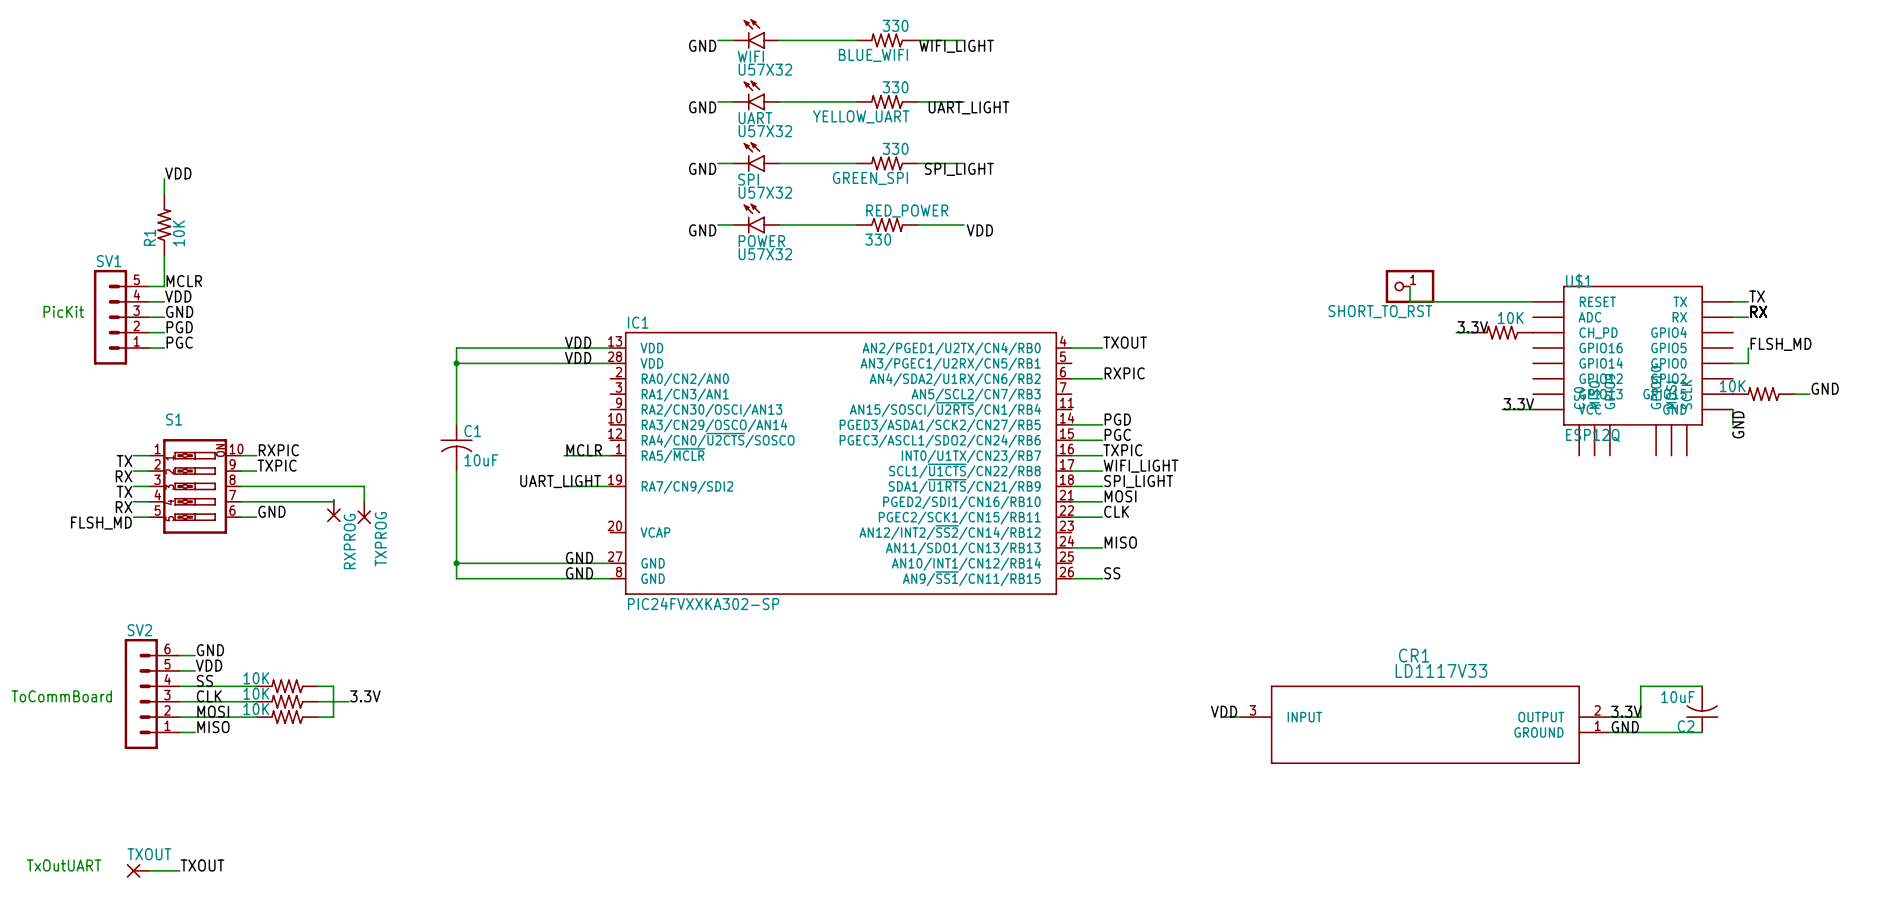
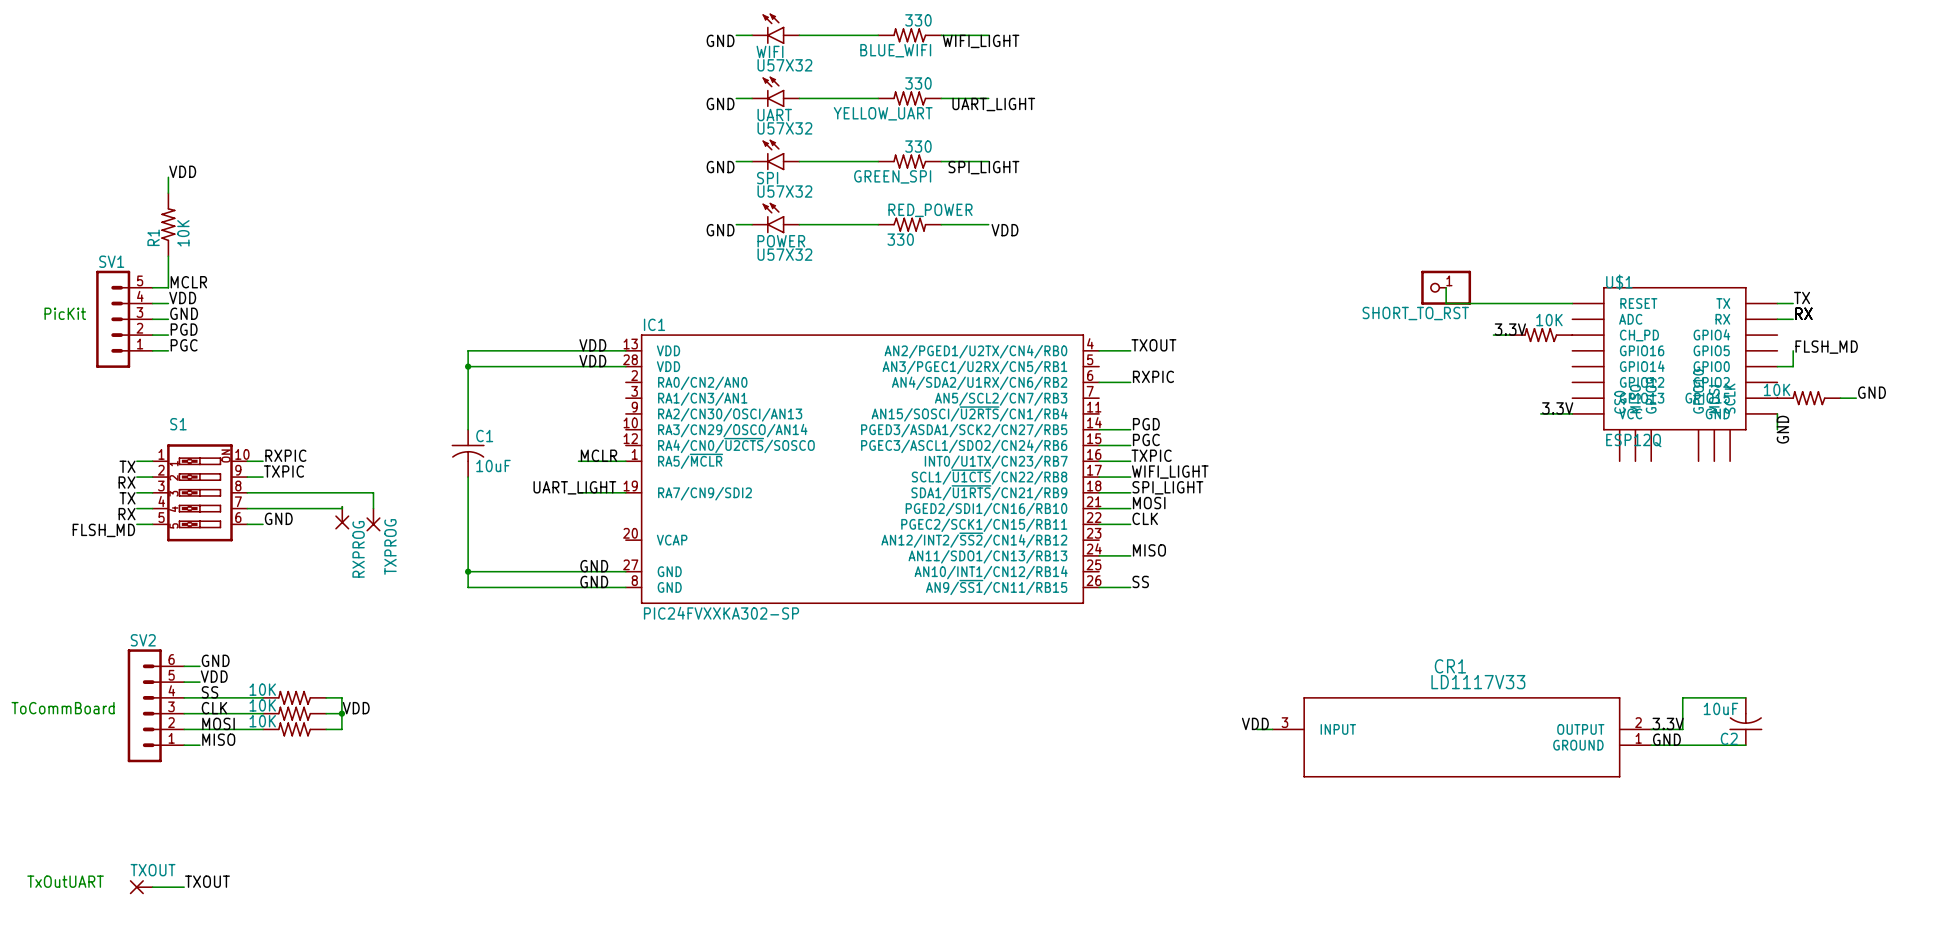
label: none -> VDD (356, 708)
label: 3.3V (365, 696) -> none
junction: none -> (341, 713)

